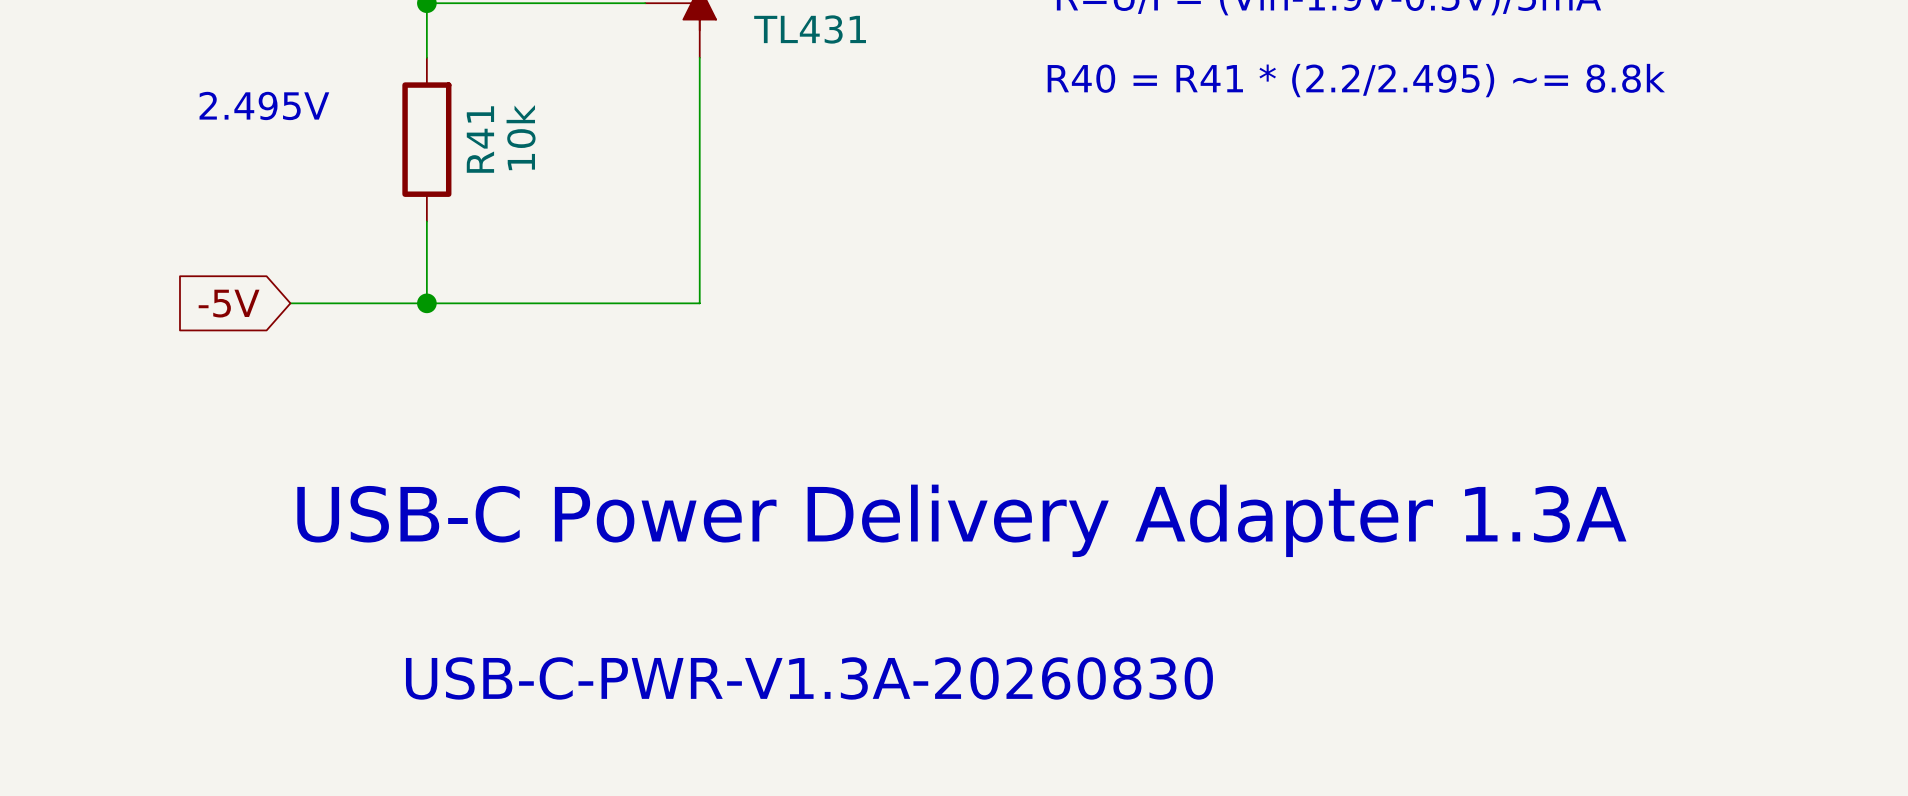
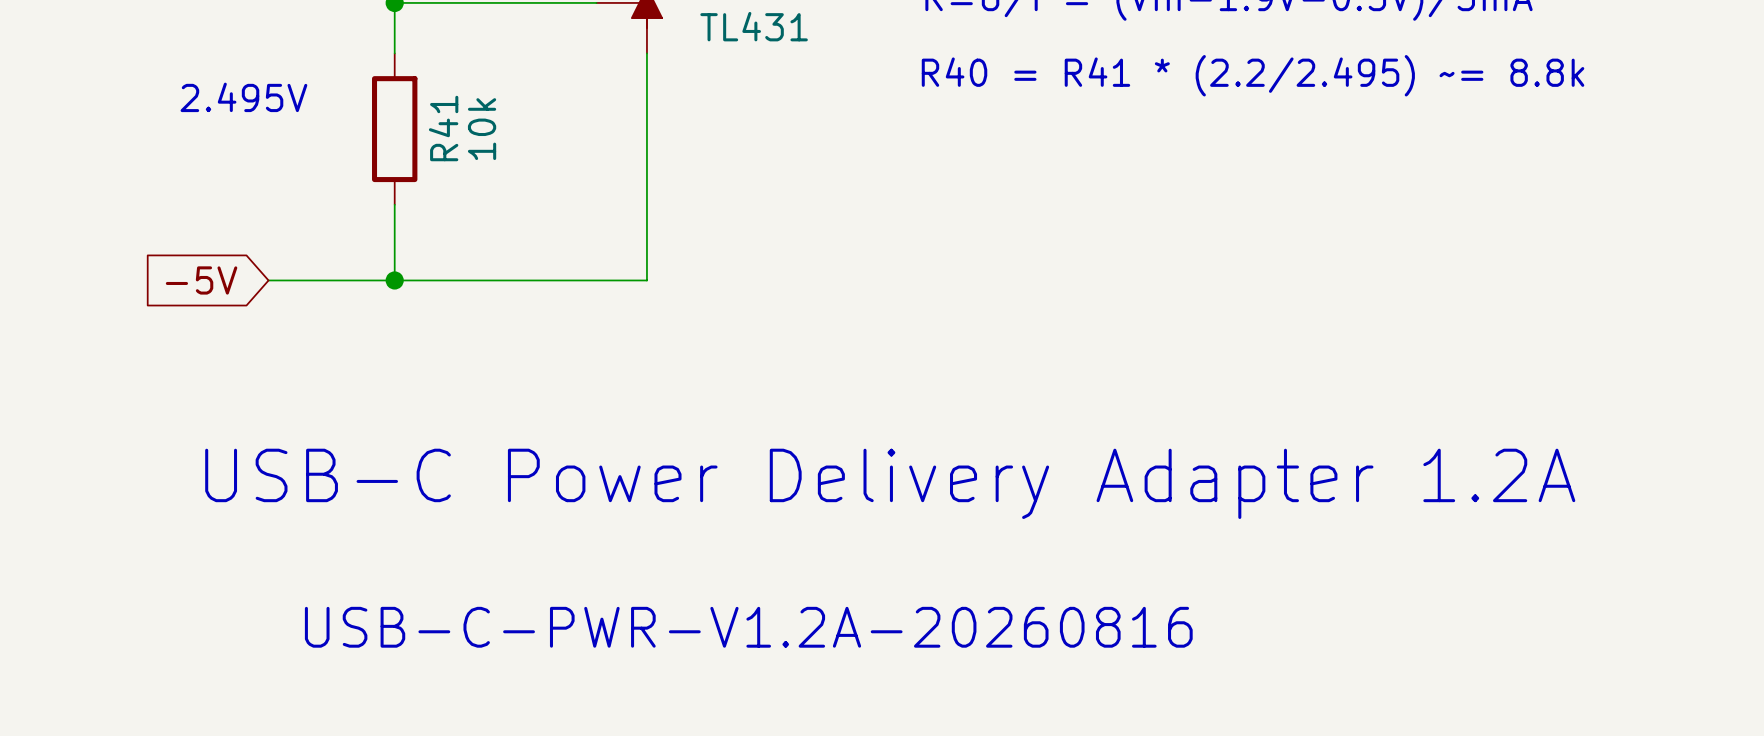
text: USB-C Power Delivery Adapter 1.3A (961, 520) -> USB-C Power Delivery Adapter 1.2A (890, 483)
text: USB-C-PWR-V1.3A-20260830 (809, 678) -> USB-C-PWR-V1.2A-20260816 (748, 627)

